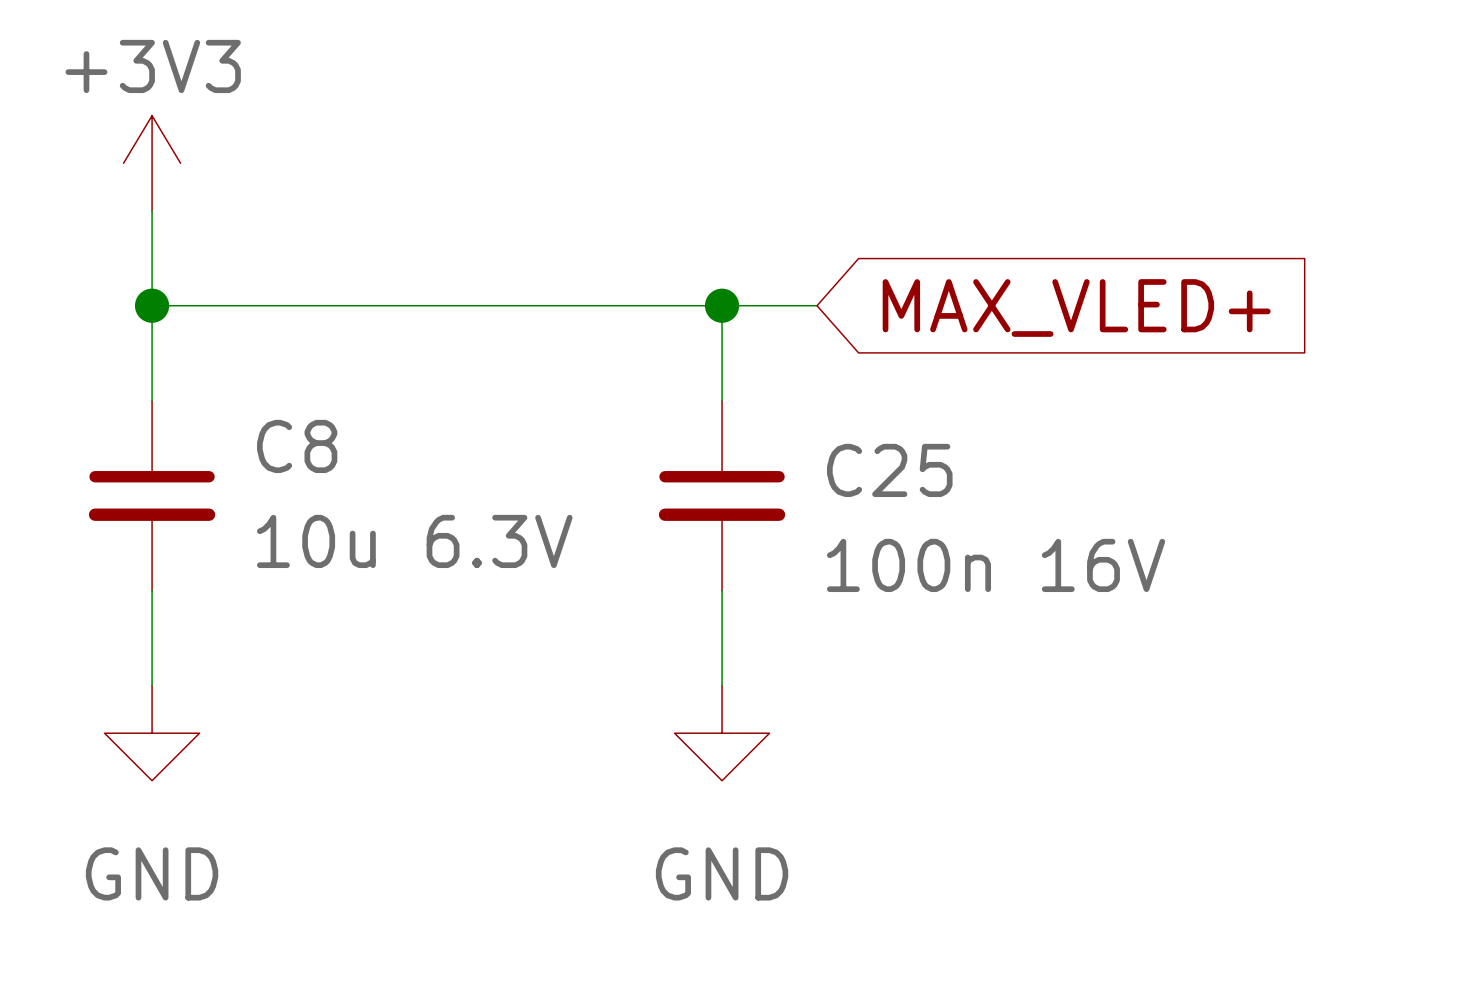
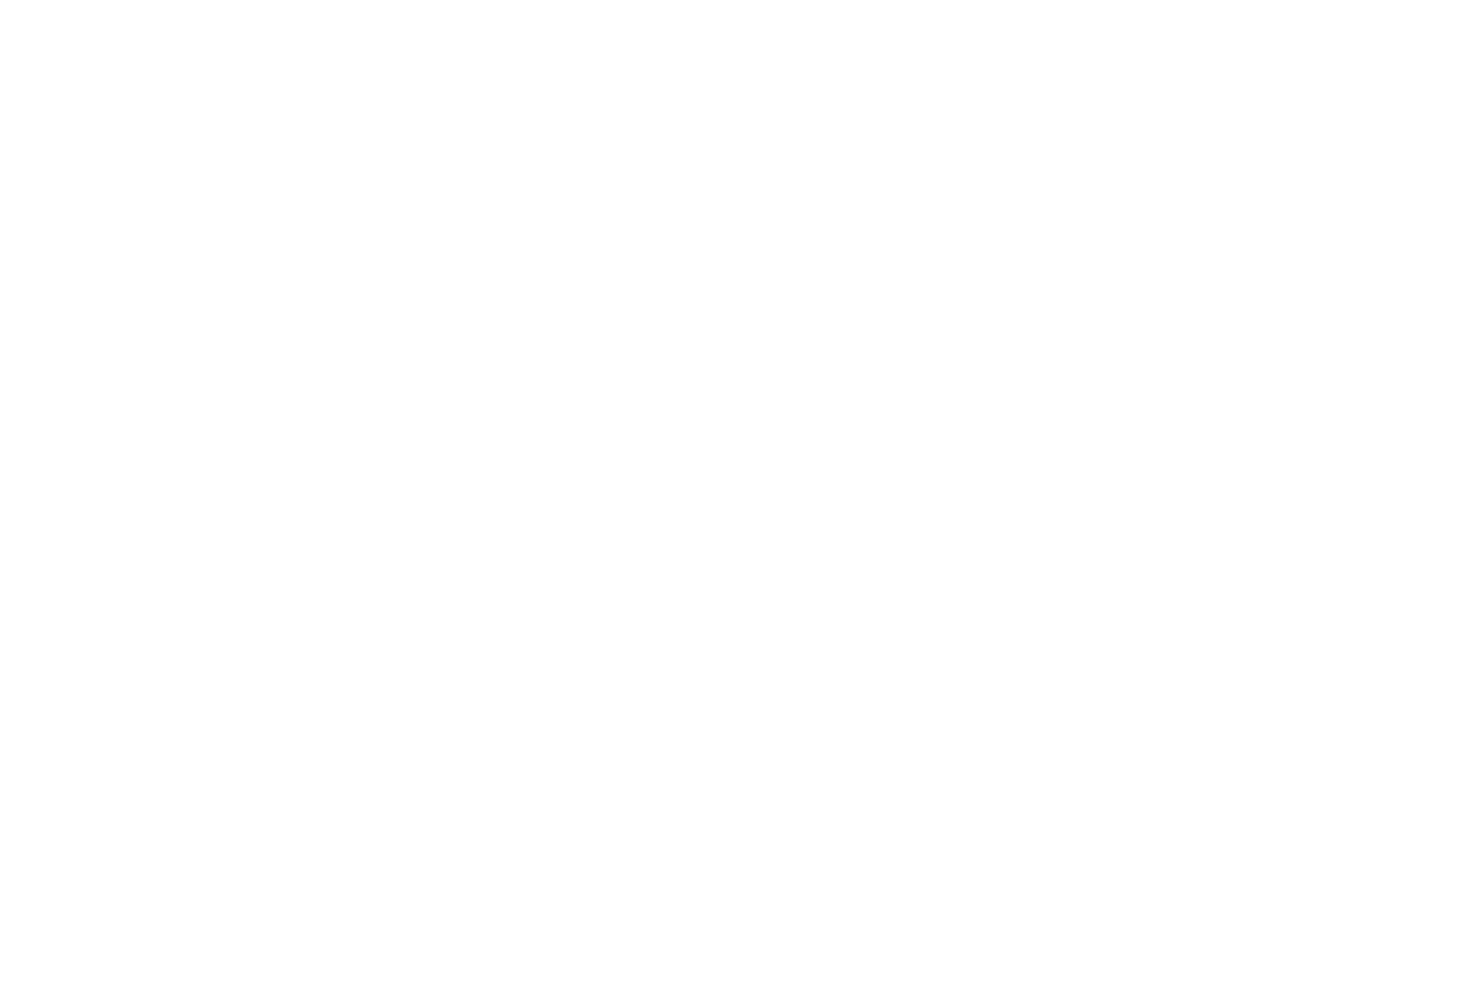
power symbol: +3V3 (152, 163) -> none
wire: (152, 210) (152, 400) -> none
wire: (152, 305) (817, 305) -> none
junction: (152, 305) -> none
wire: (722, 305) (722, 400) -> none
junction: (722, 305) -> none
global label: MAX_VLED+ (1076, 307) -> none
C8: 10u 6.3V (152, 495) -> none
C25: 100n 16V (722, 495) -> none
wire: (152, 590) (152, 685) -> none
wire: (722, 590) (722, 685) -> none
power symbol: GND (152, 733) -> none
power symbol: GND (722, 733) -> none

